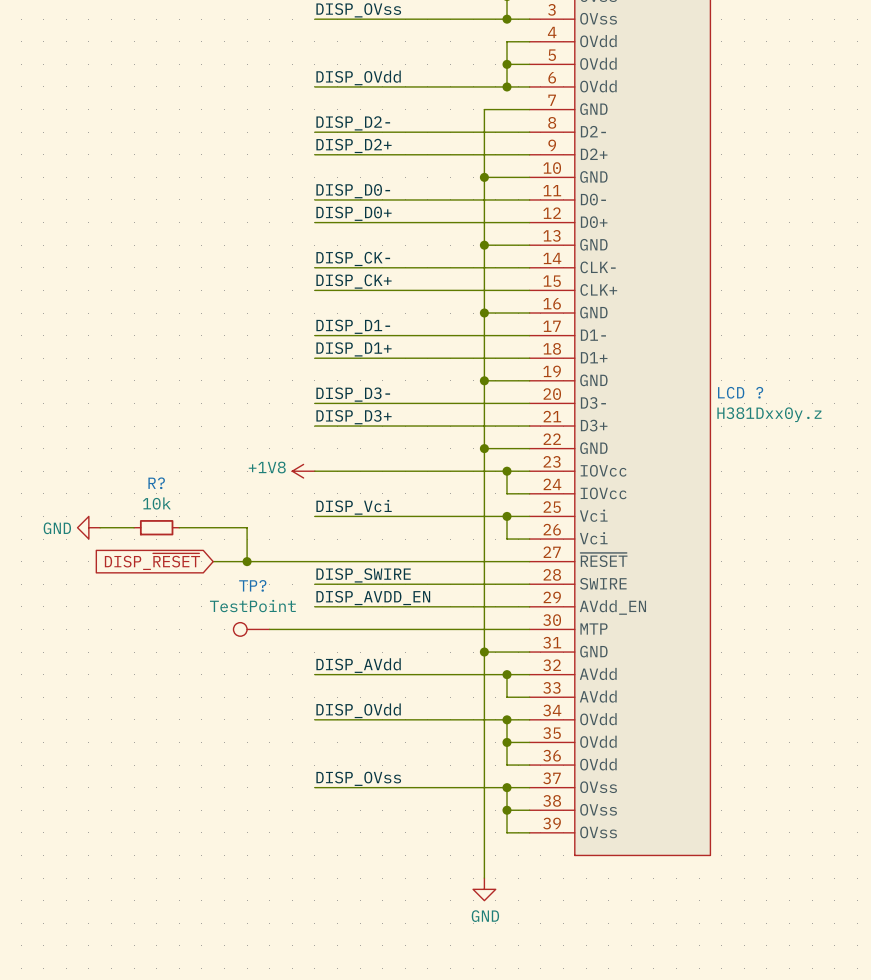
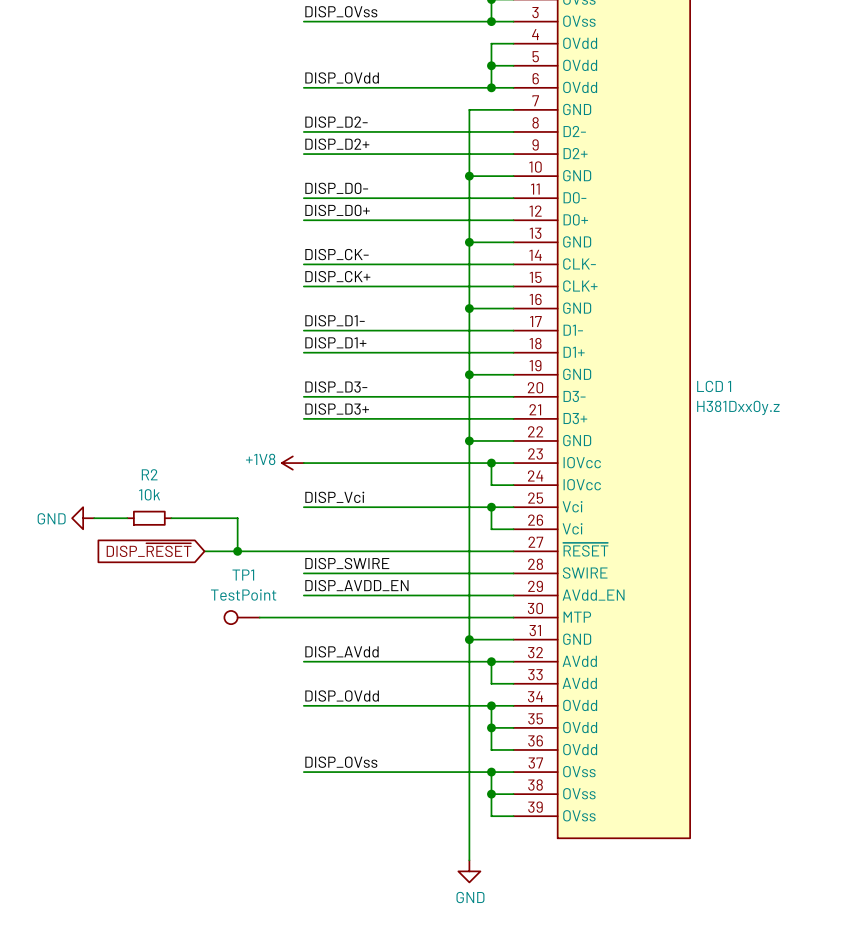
LCD ? name: LCD ? (740, 392) -> LCD 1 (714, 386)
R? name: R? (156, 483) -> R2 (149, 474)
TP? name: TP? (252, 585) -> TP1 (243, 575)

